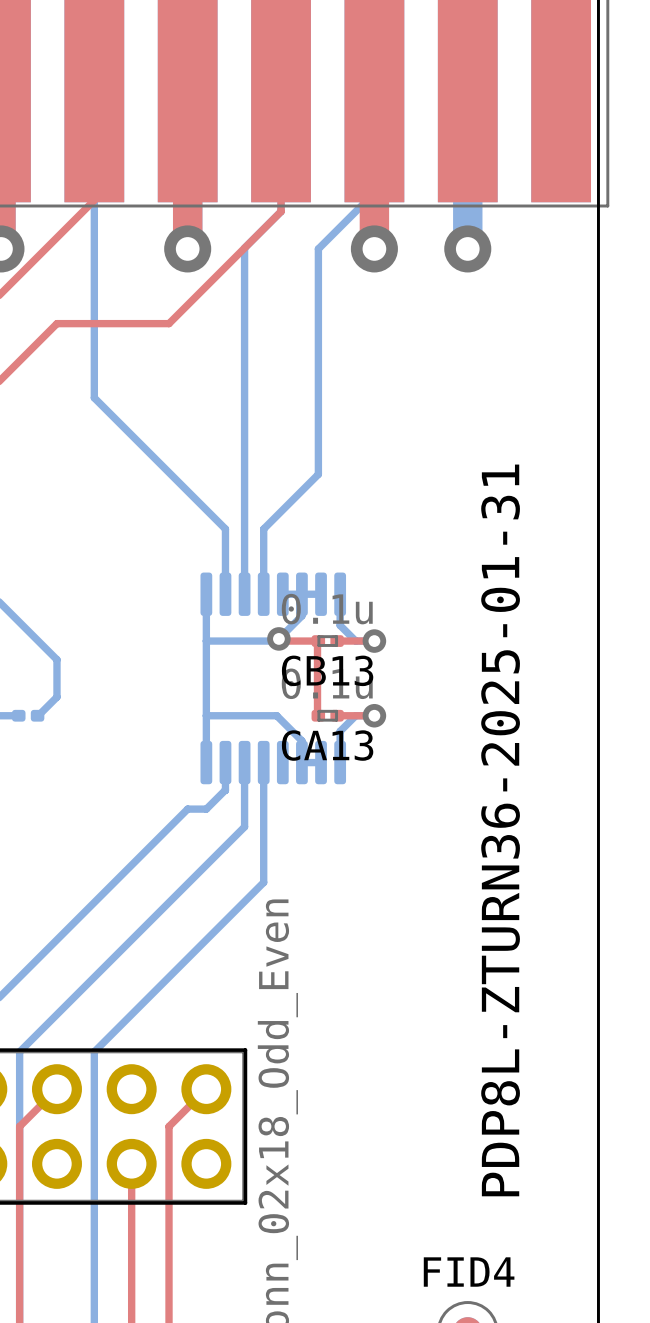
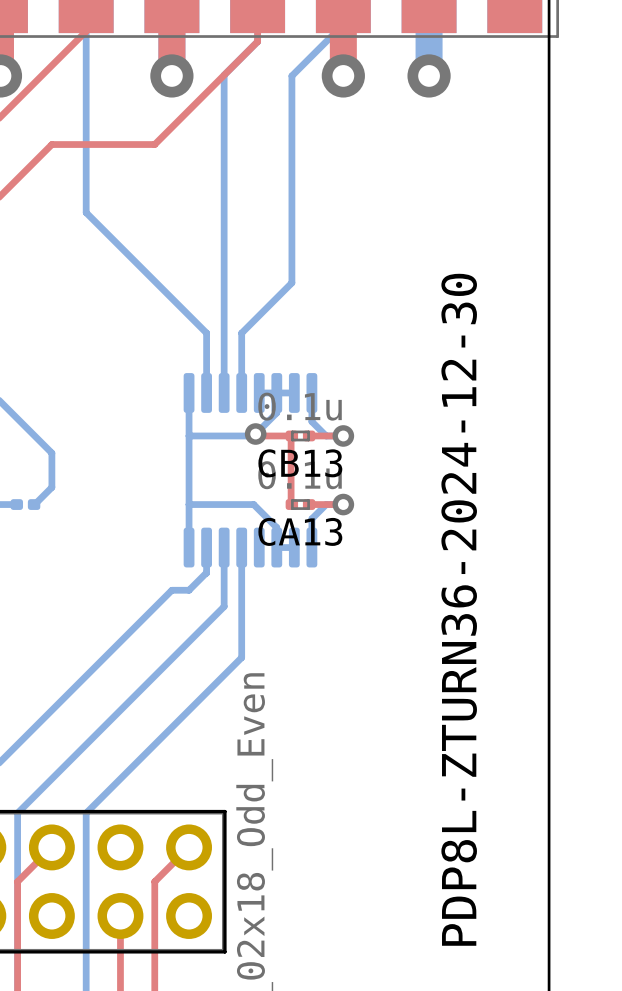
text: PDP8L-ZTURN36-2025-01-31 (500, 830) -> PDP8L-ZTURN36-2024-12-30 (459, 609)

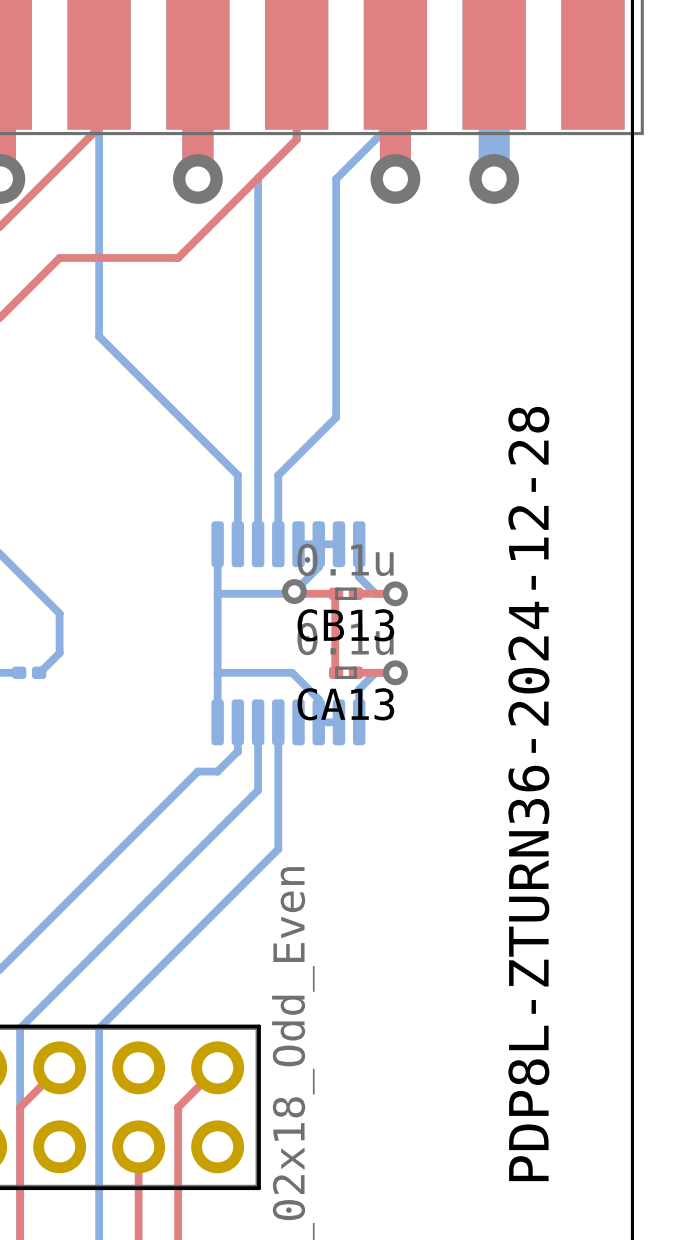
text: PDP8L-ZTURN36-2024-12-30 (459, 609) -> PDP8L-ZTURN36-2024-12-28 (528, 794)

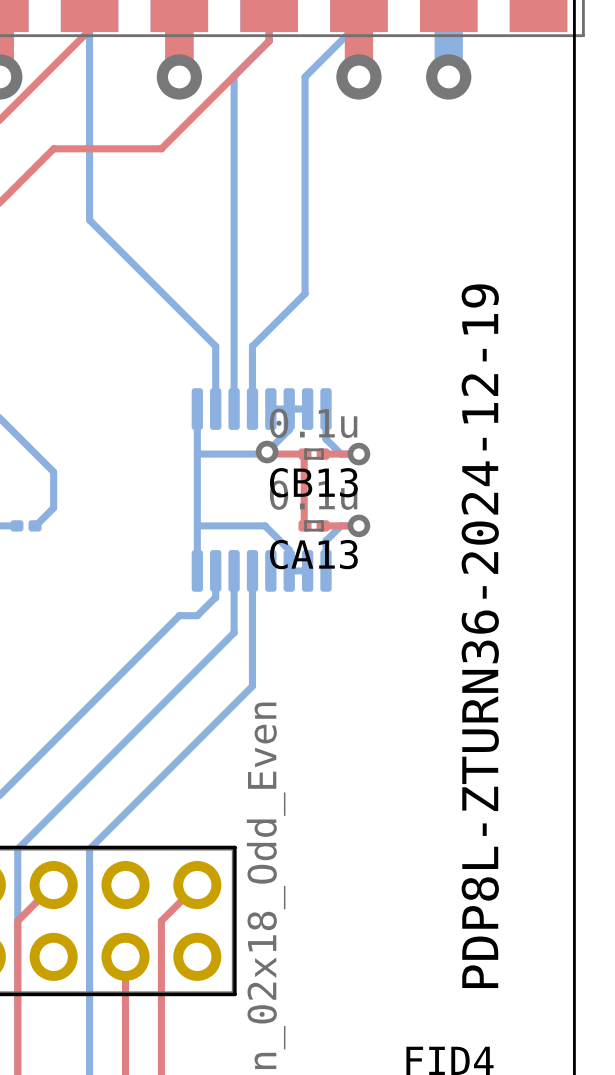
text: PDP8L-ZTURN36-2024-12-28 (528, 794) -> PDP8L-ZTURN36-2024-12-19 (480, 636)

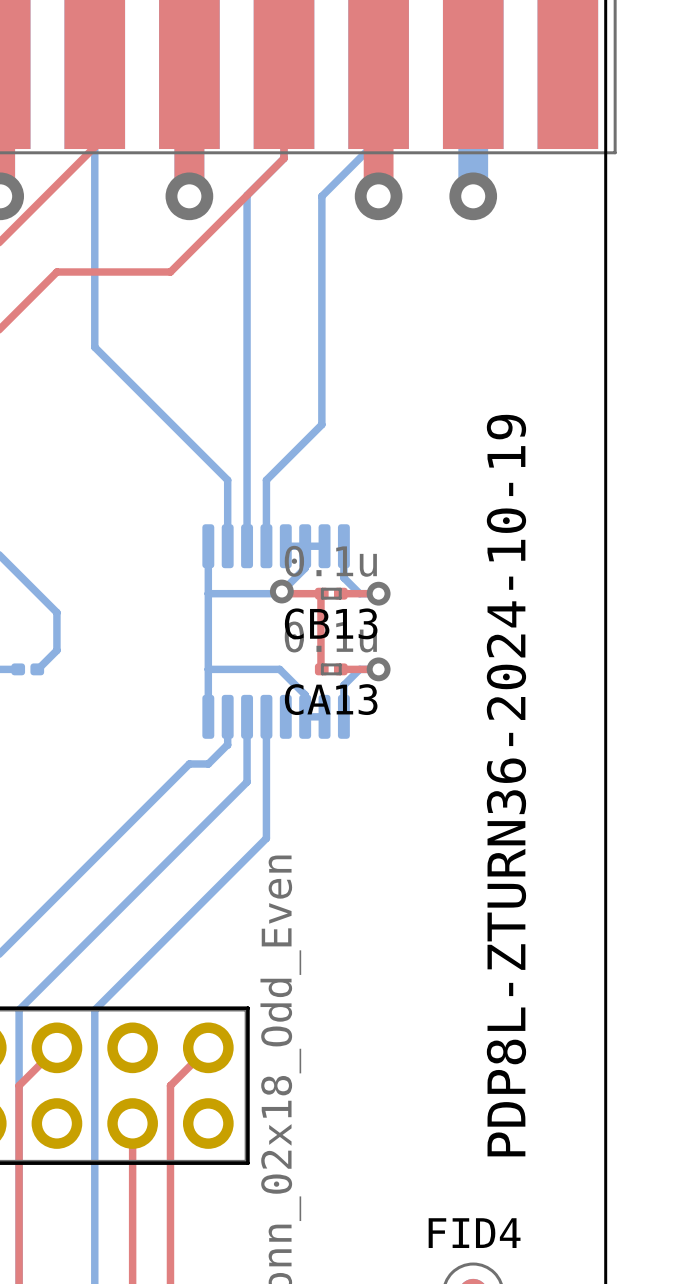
text: PDP8L-ZTURN36-2024-12-19 (480, 636) -> PDP8L-ZTURN36-2024-10-19 (506, 785)

